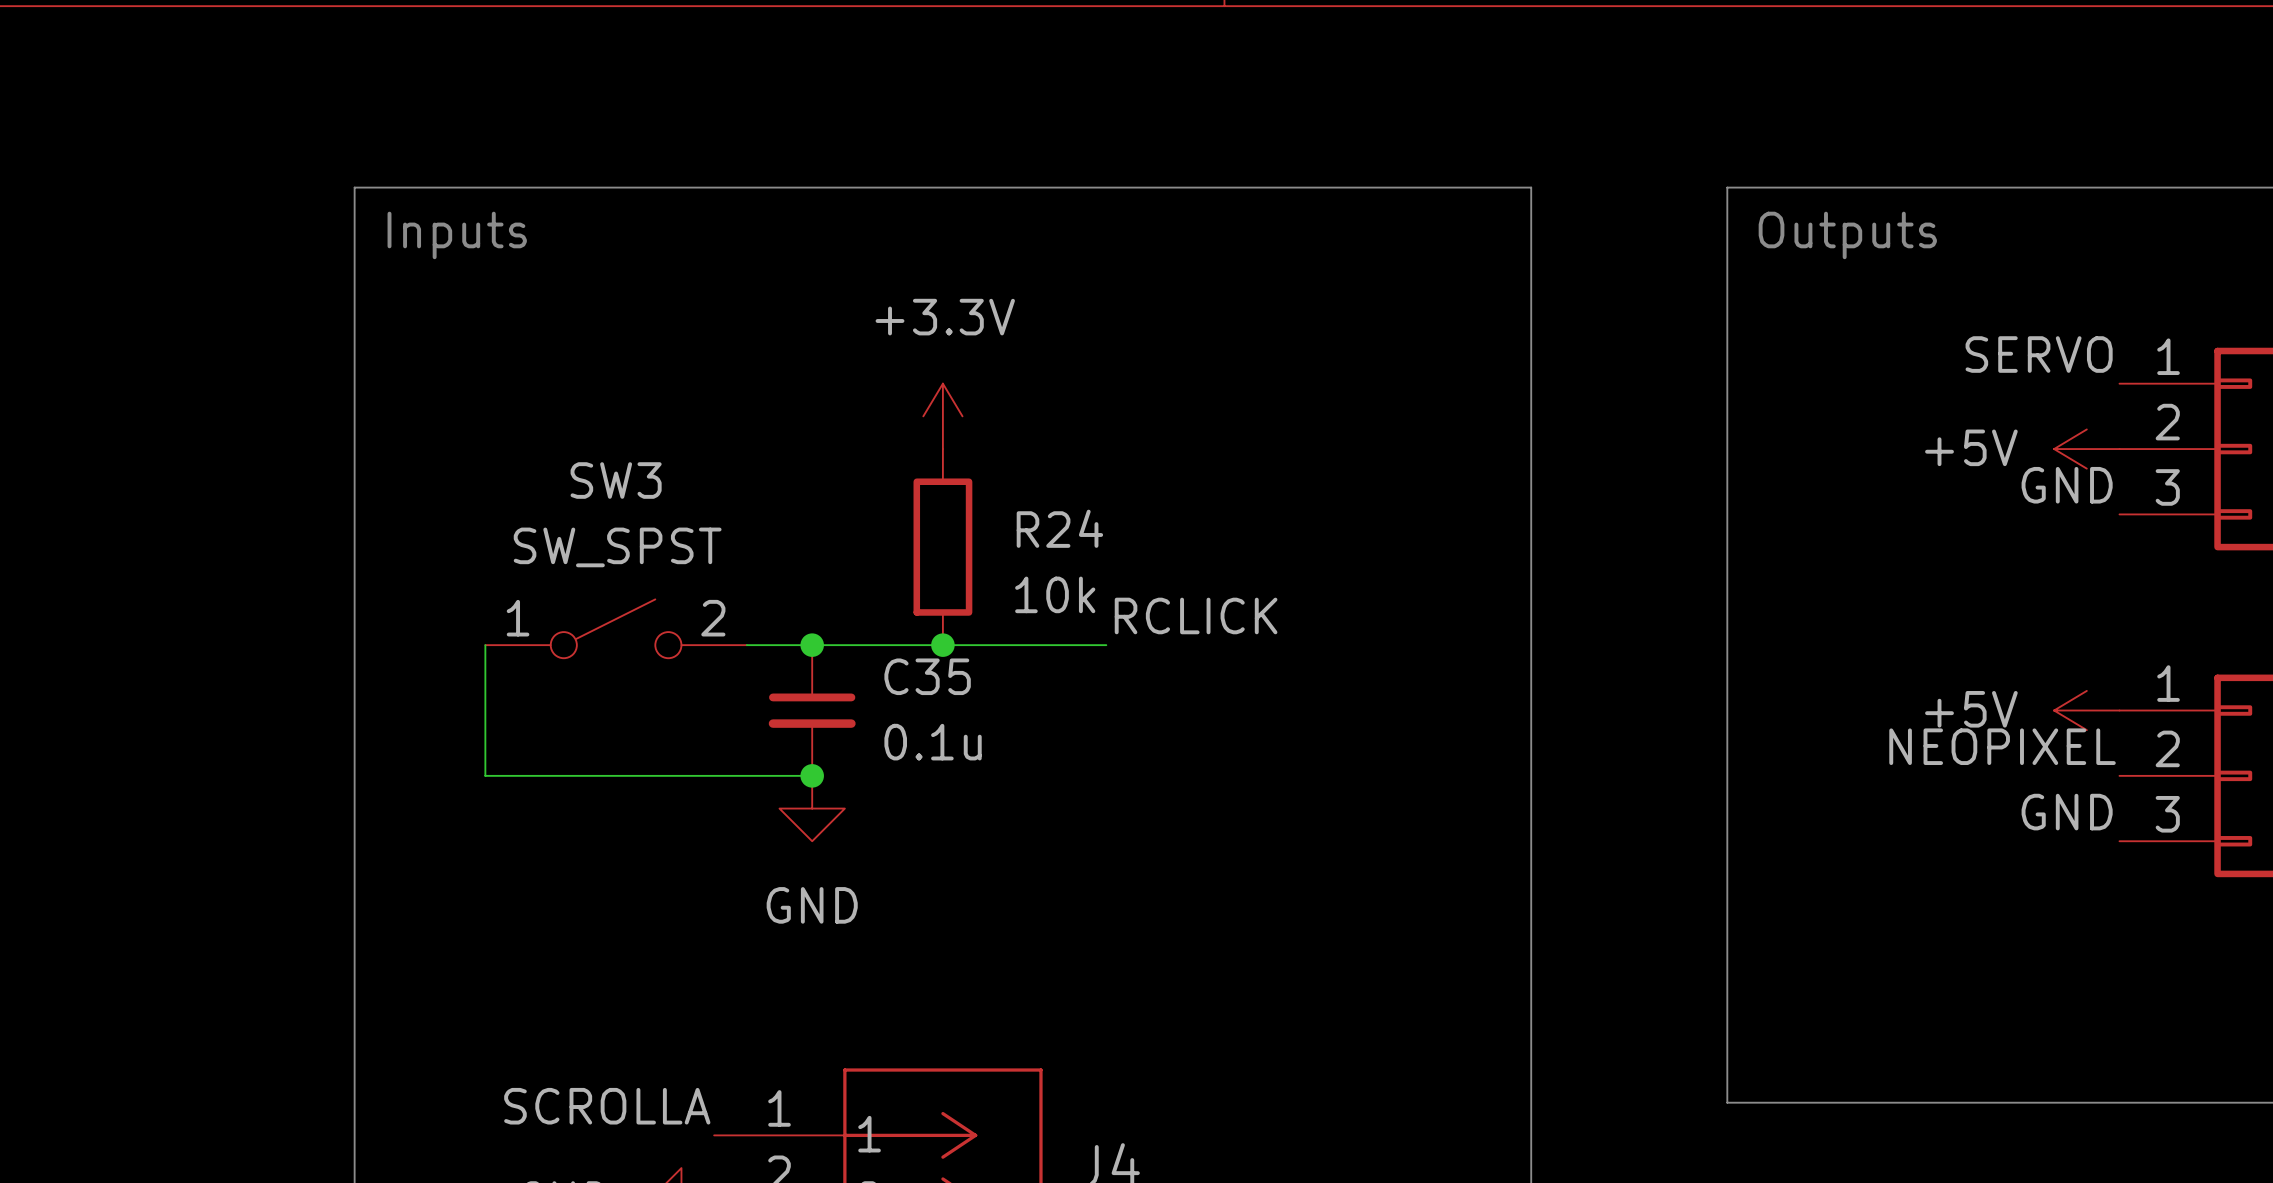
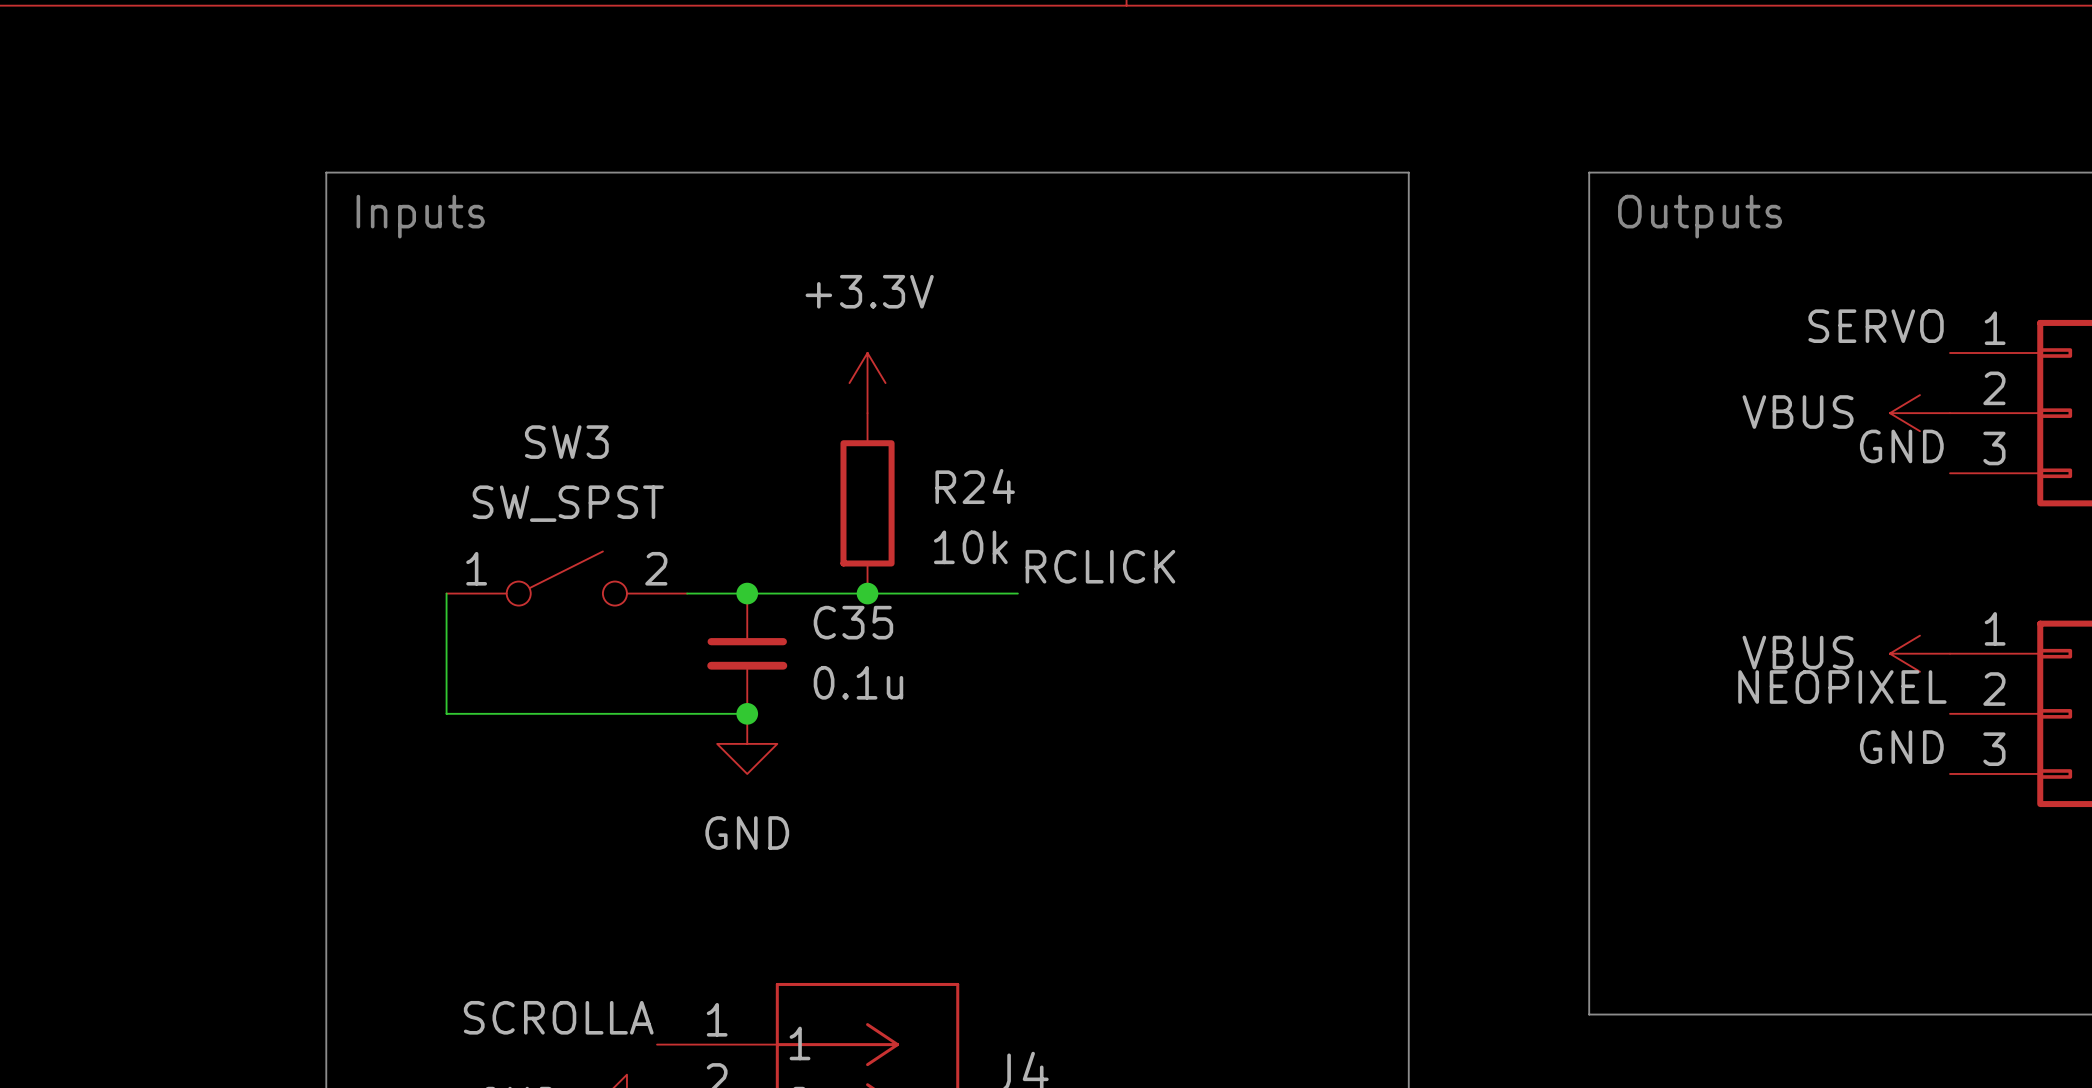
power symbol: +5V (2086, 449) -> VBUS (1919, 413)
power symbol: +5V (2086, 710) -> VBUS (1919, 653)

